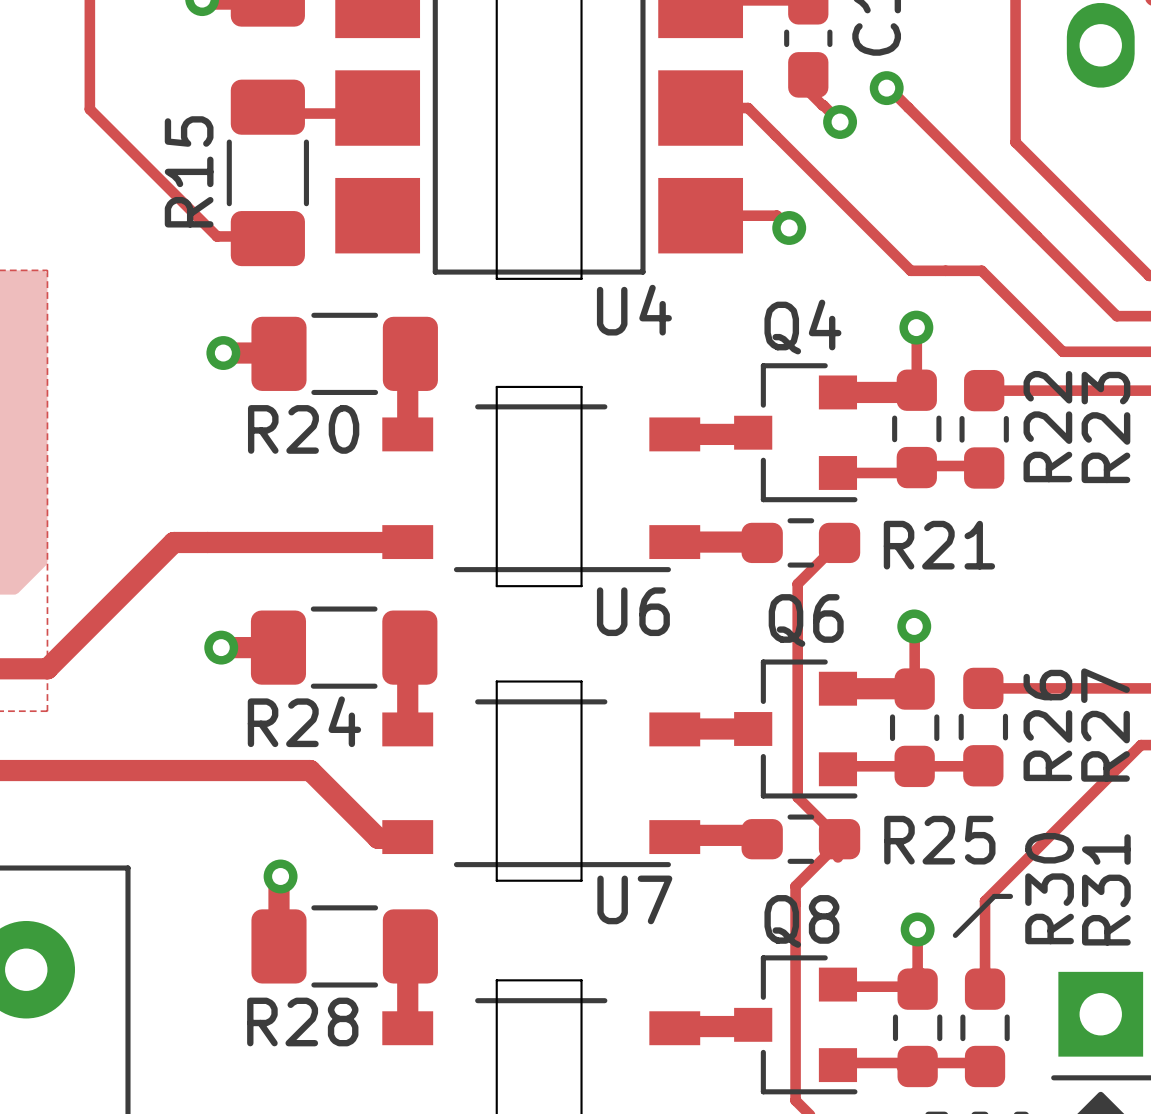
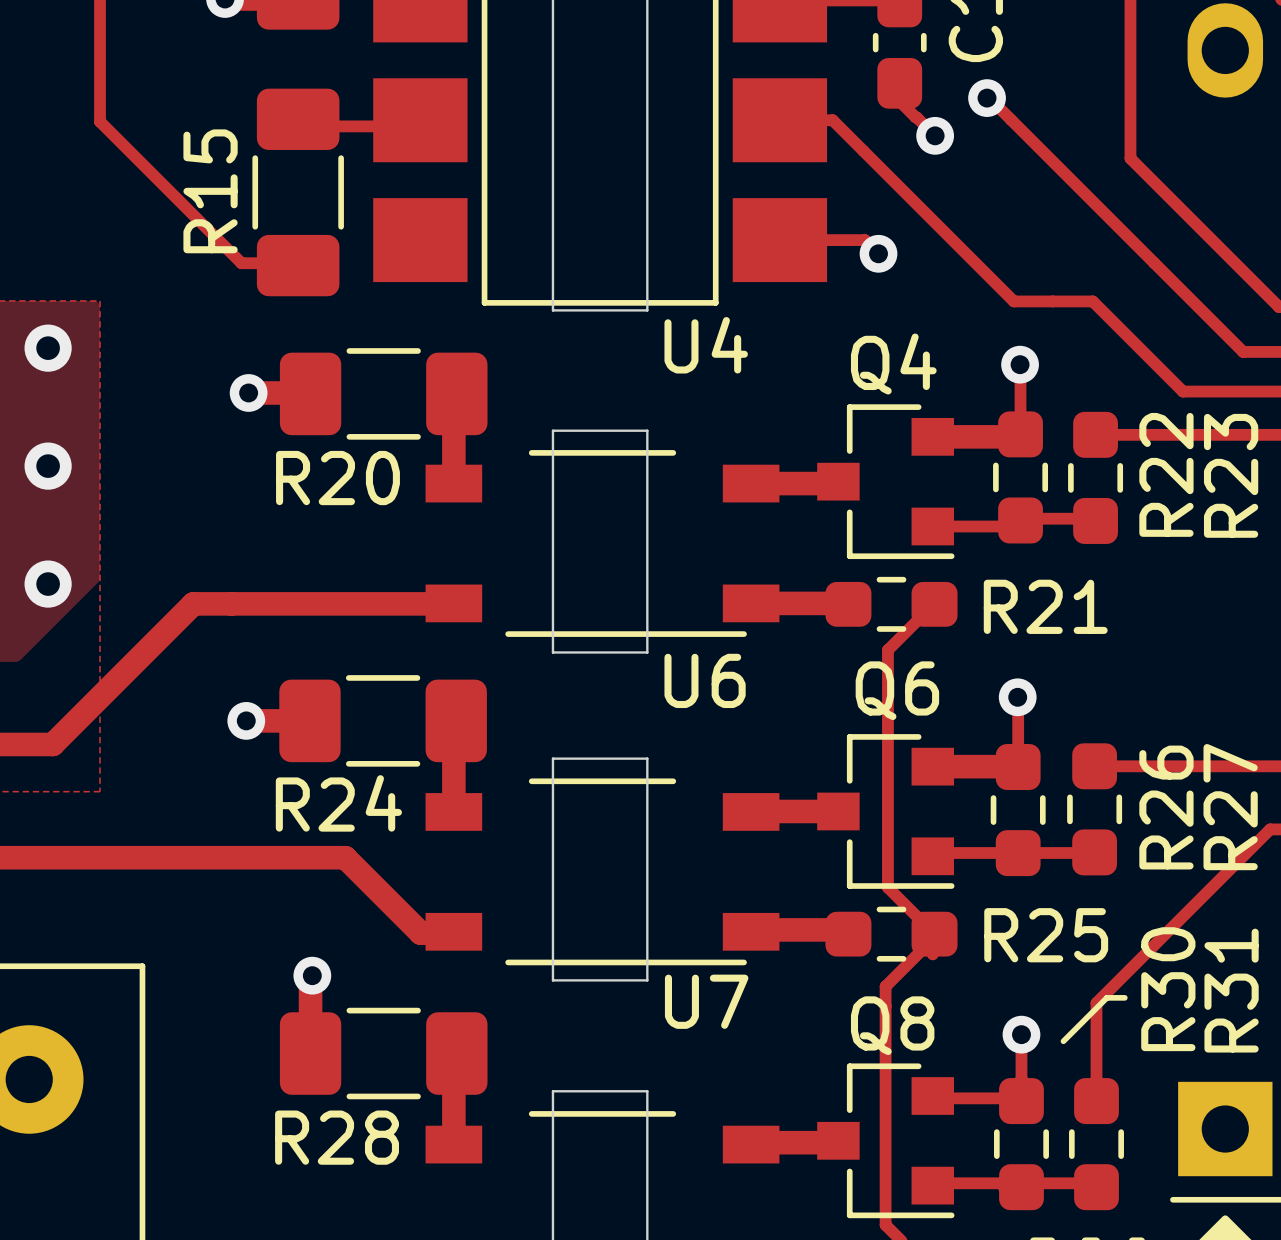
zone outline: (47, 270) (47, 711) -> (52, 300) (100, 300) (100, 791) (52, 791)
via: none -> (48, 348)
via: none -> (48, 466)
via: none -> (48, 584)

